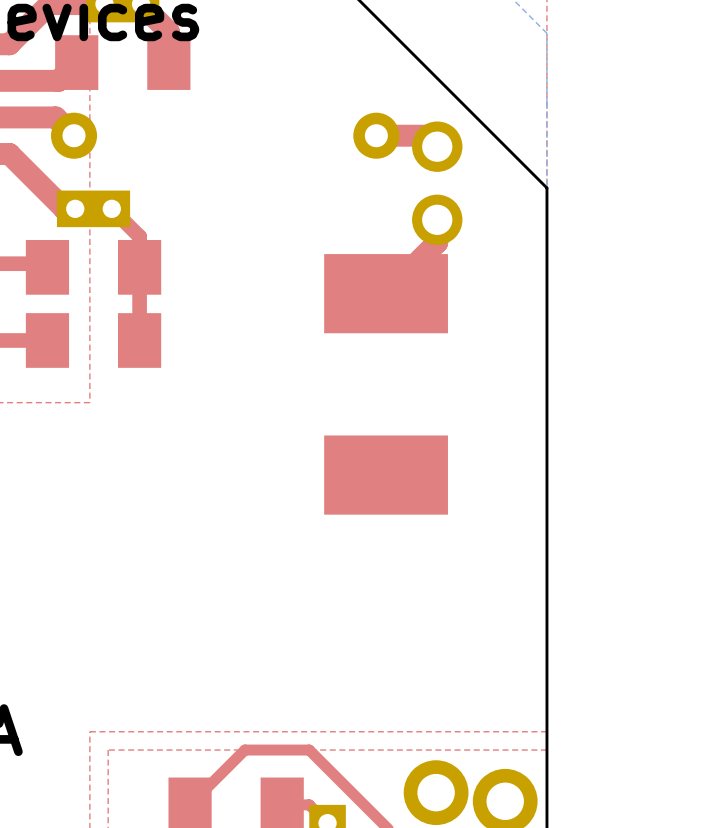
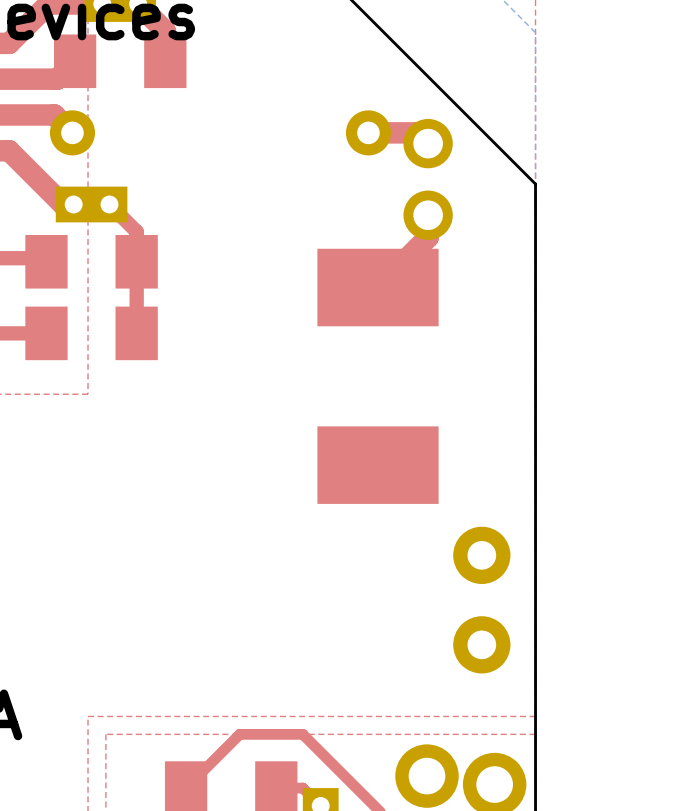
part: none -> (481, 555)
part: none -> (481, 644)

